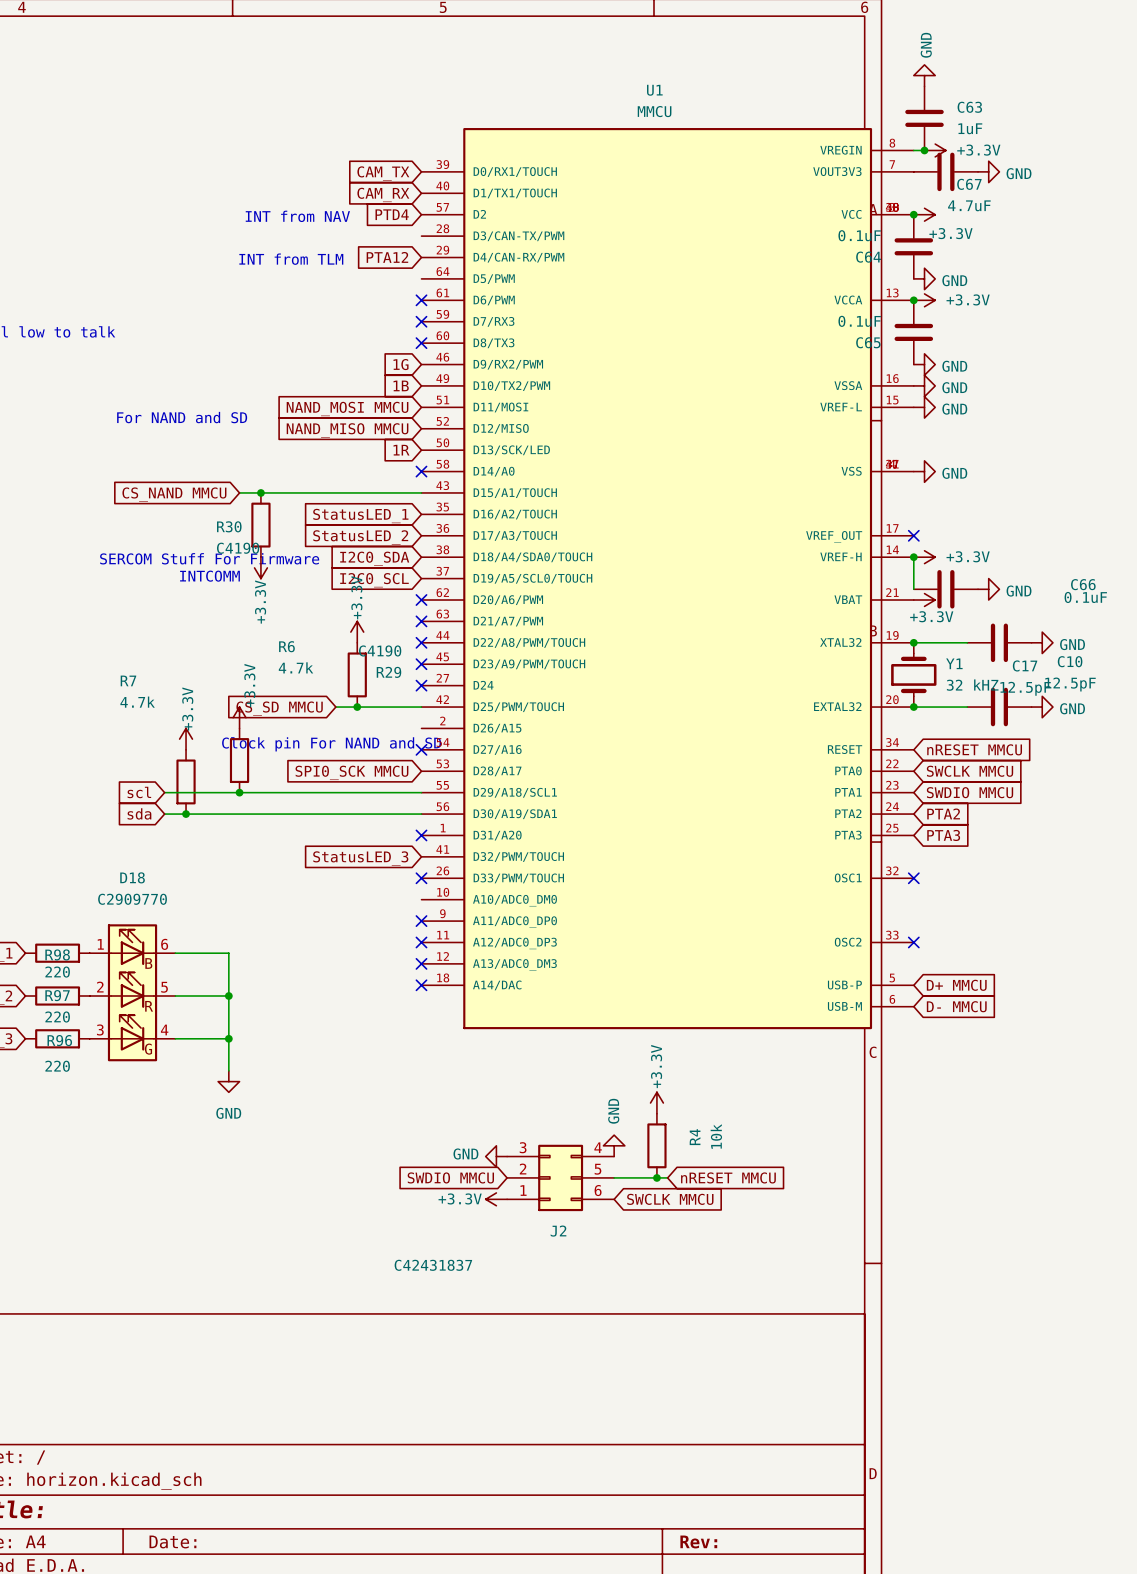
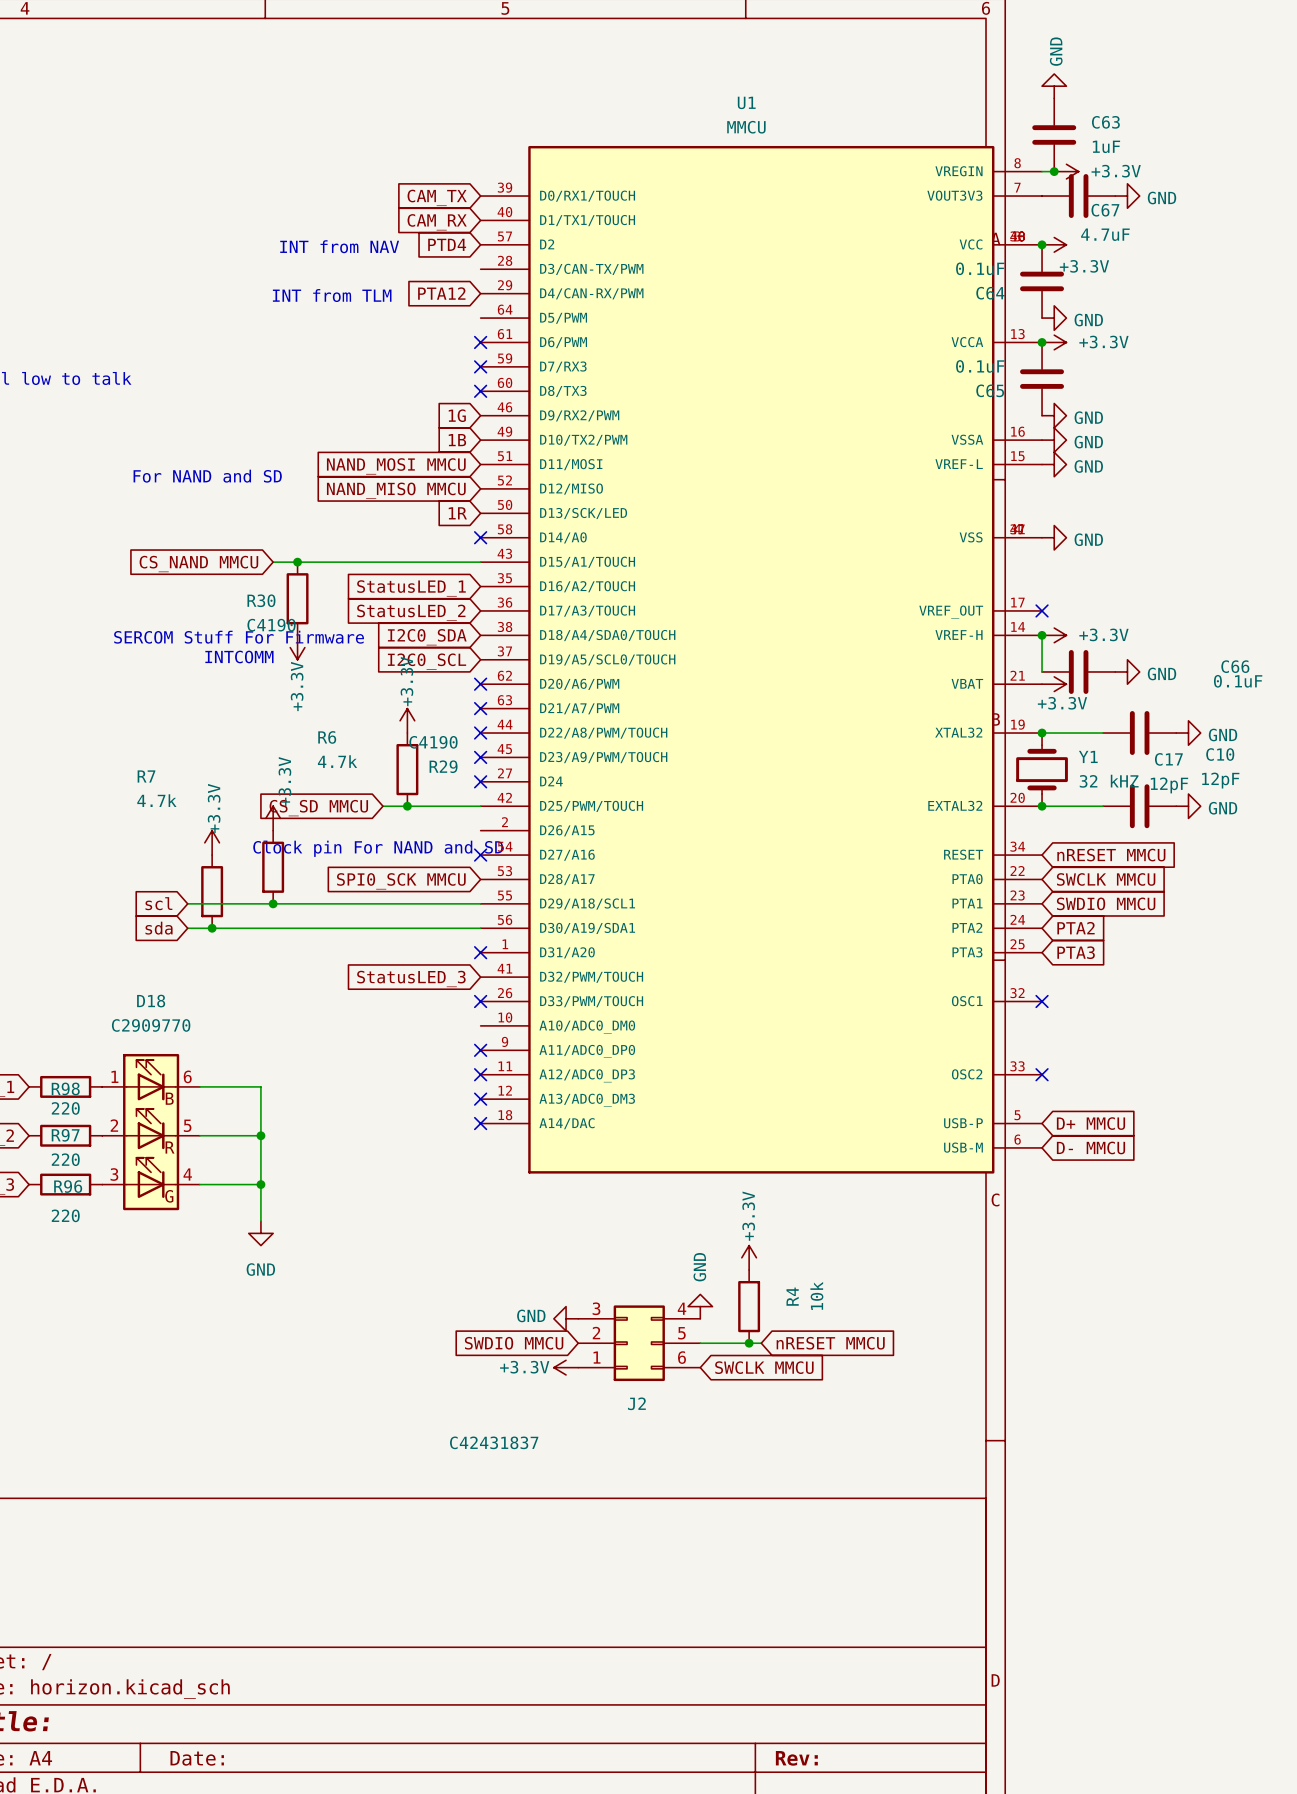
C10 value: 12.5pF (1070, 684) -> 12pF (1220, 780)
C17 value: 12.5pF (1025, 688) -> 12pF (1169, 785)

